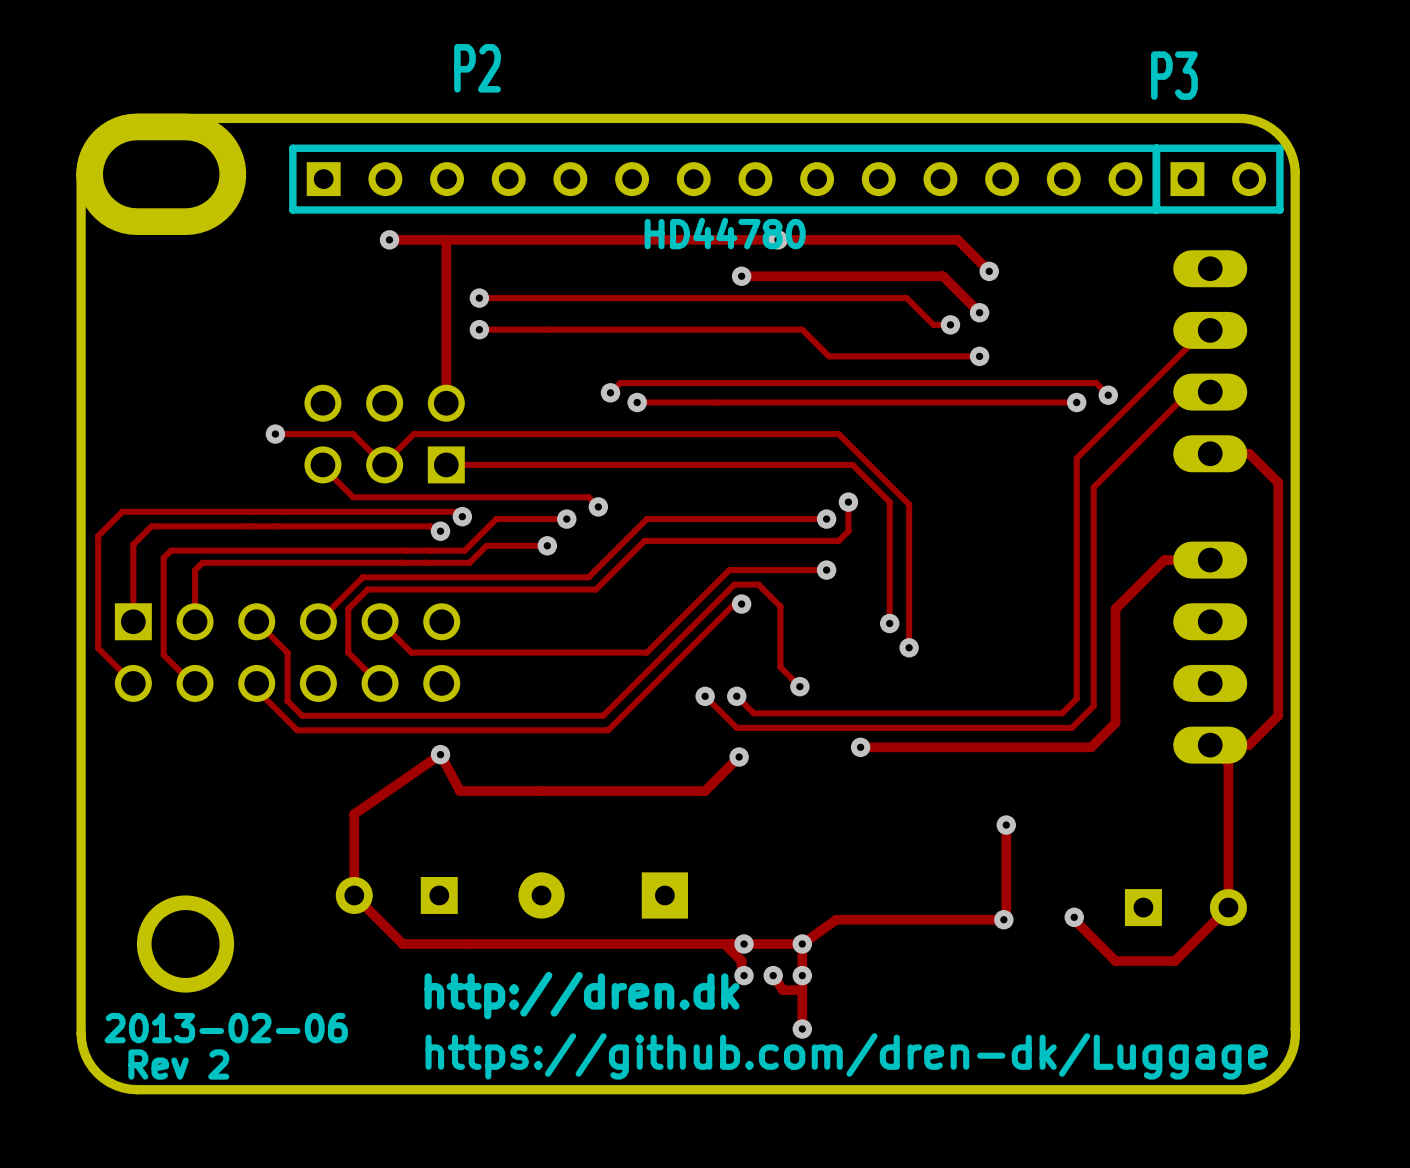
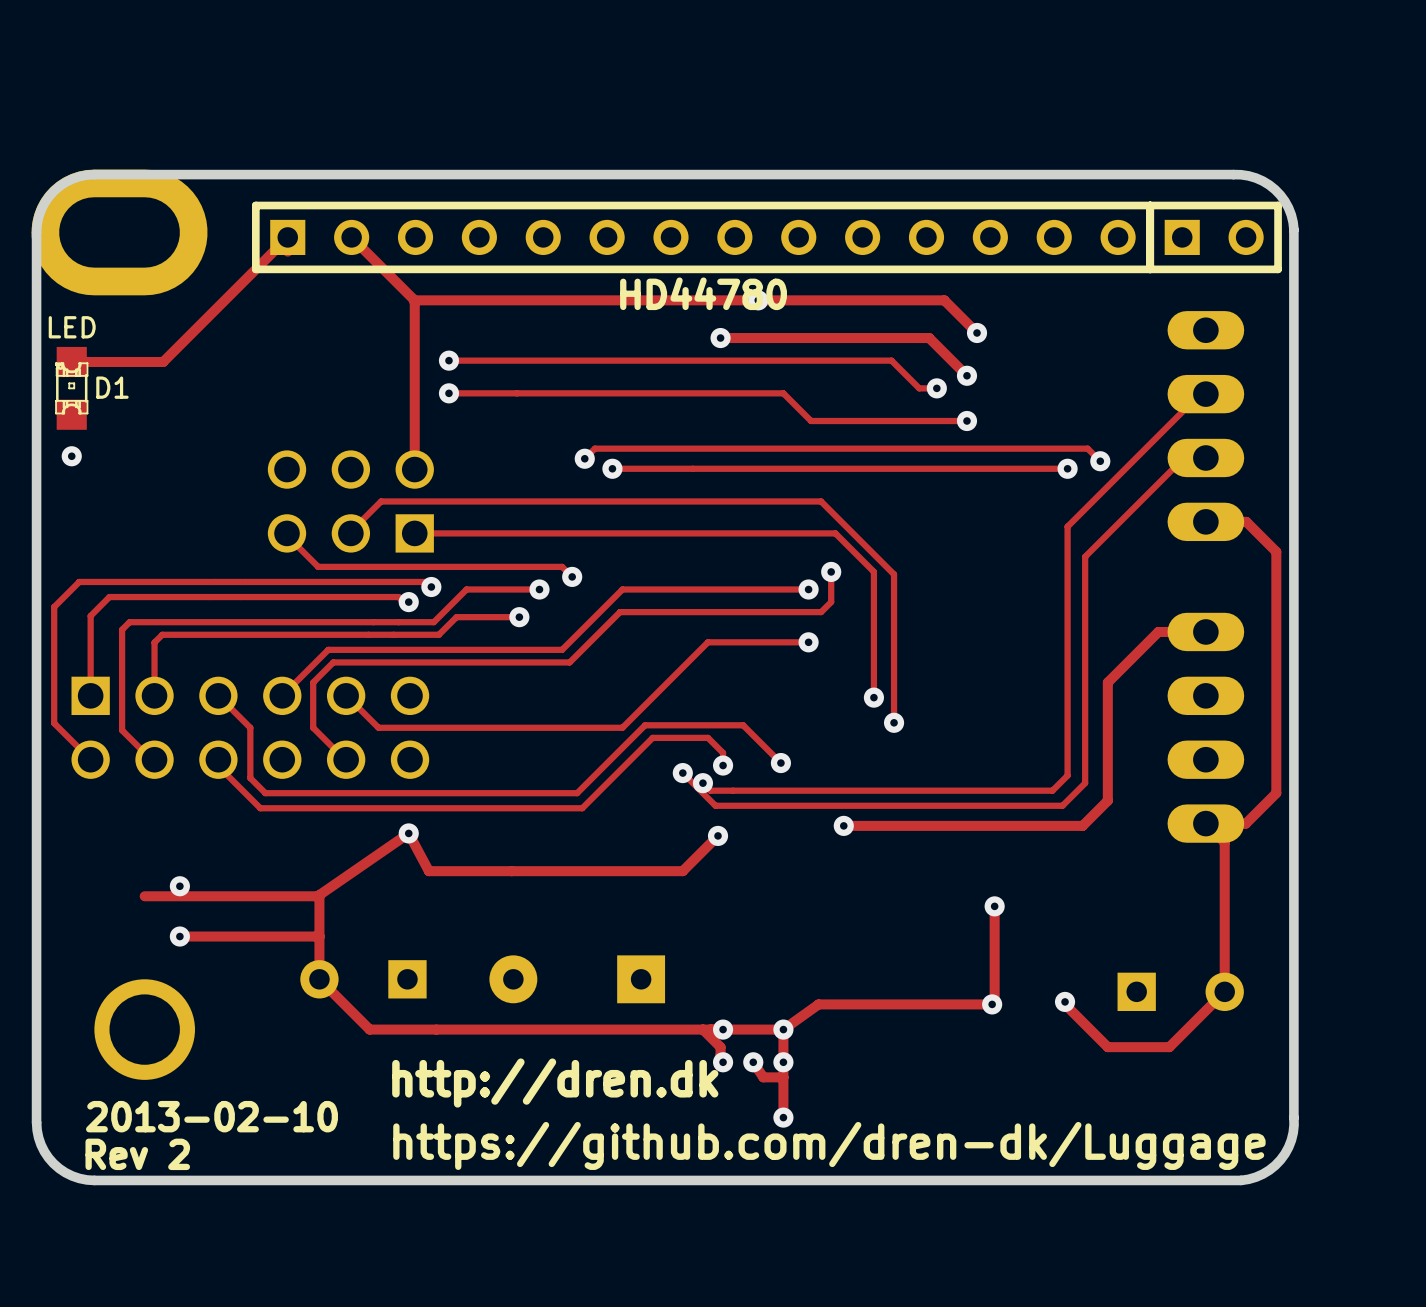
P2 name: P2 (477, 68) -> none
P3 name: P3 (1174, 75) -> none
track: none -> (287, 251) (287, 237) (163, 361) (71, 361)
track: (389, 239) (445, 239) -> (351, 237) (413, 300)
via: (389, 239) -> none
D1: none -> LED (71, 388)
via: none -> (71, 456)
track: (275, 434) (353, 434) (383, 464) -> none
via: (275, 434) -> none
track: (741, 604) (734, 604) (676, 662) -> (723, 765) (723, 752) (707, 737) (652, 737)
via: (741, 604) -> none
track: (668, 650) (734, 584) (758, 584) (780, 606) (780, 667) -> (645, 725) (743, 725) (760, 742)
via: none -> (723, 765)
track: (736, 696) (753, 713) -> (702, 783) (710, 790) (733, 790)
via: (736, 696) -> none
via: none -> (702, 783)
via: none -> (179, 886)
track: none -> (144, 896) (319, 896)
track: none -> (179, 936) (319, 936)
via: none -> (179, 936)
text: 2013-02-06 (226, 1028) -> 2013-02-10 (211, 1116)

